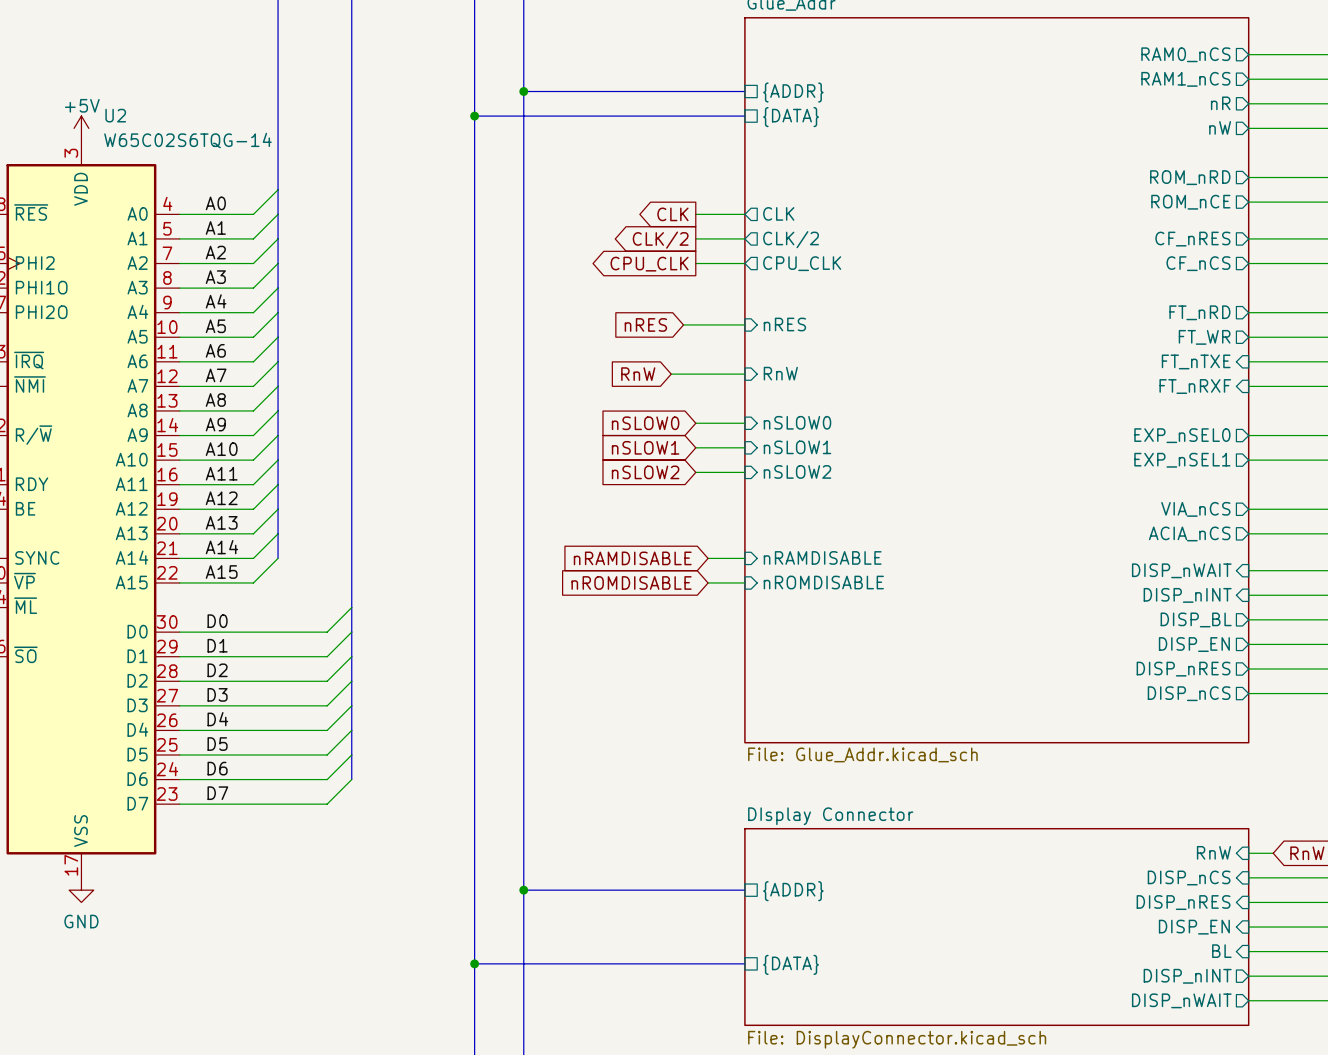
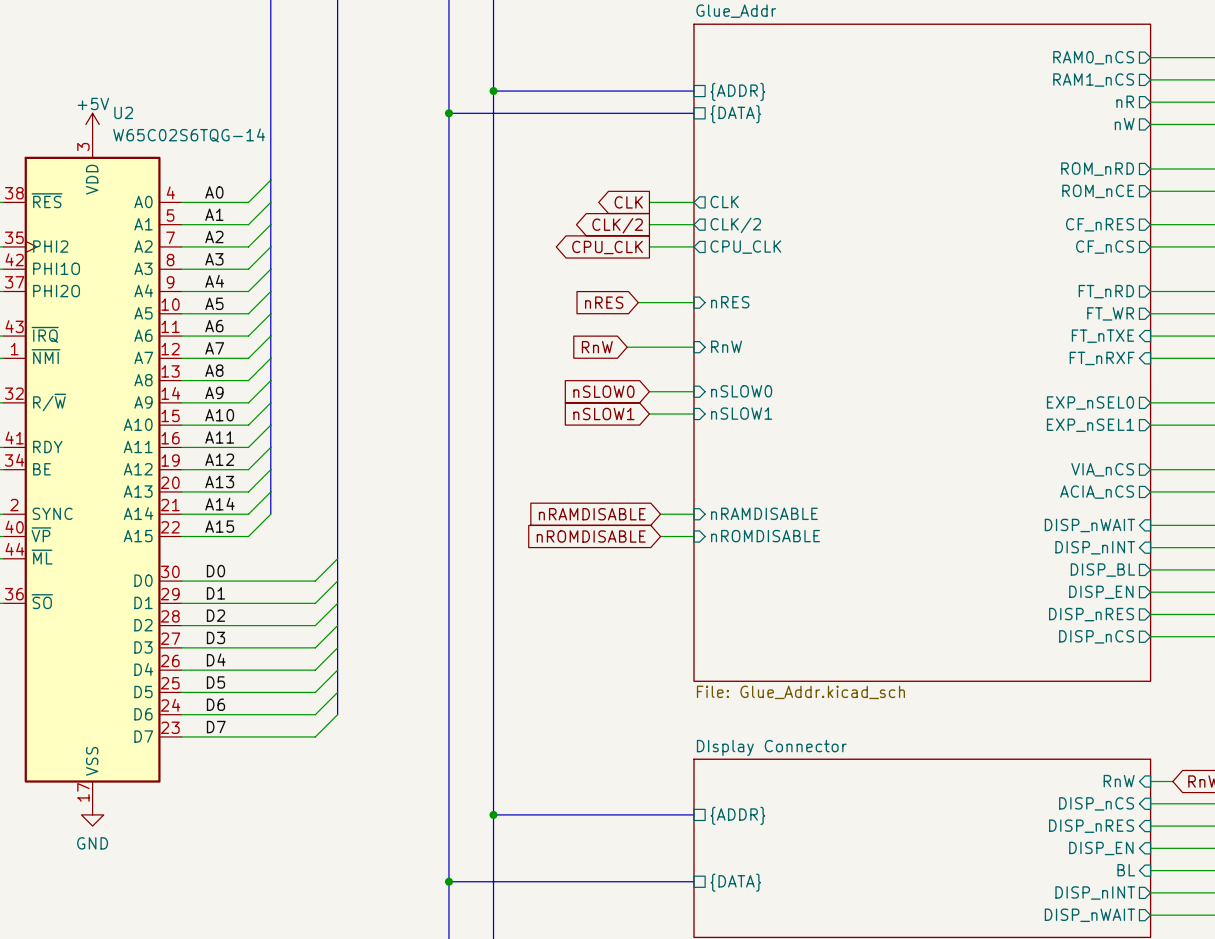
sheet pin: nSLOW2 (797, 471) -> none
global label: nSLOW2 (645, 472) -> none
wire: (695, 472) (744, 472) -> none

